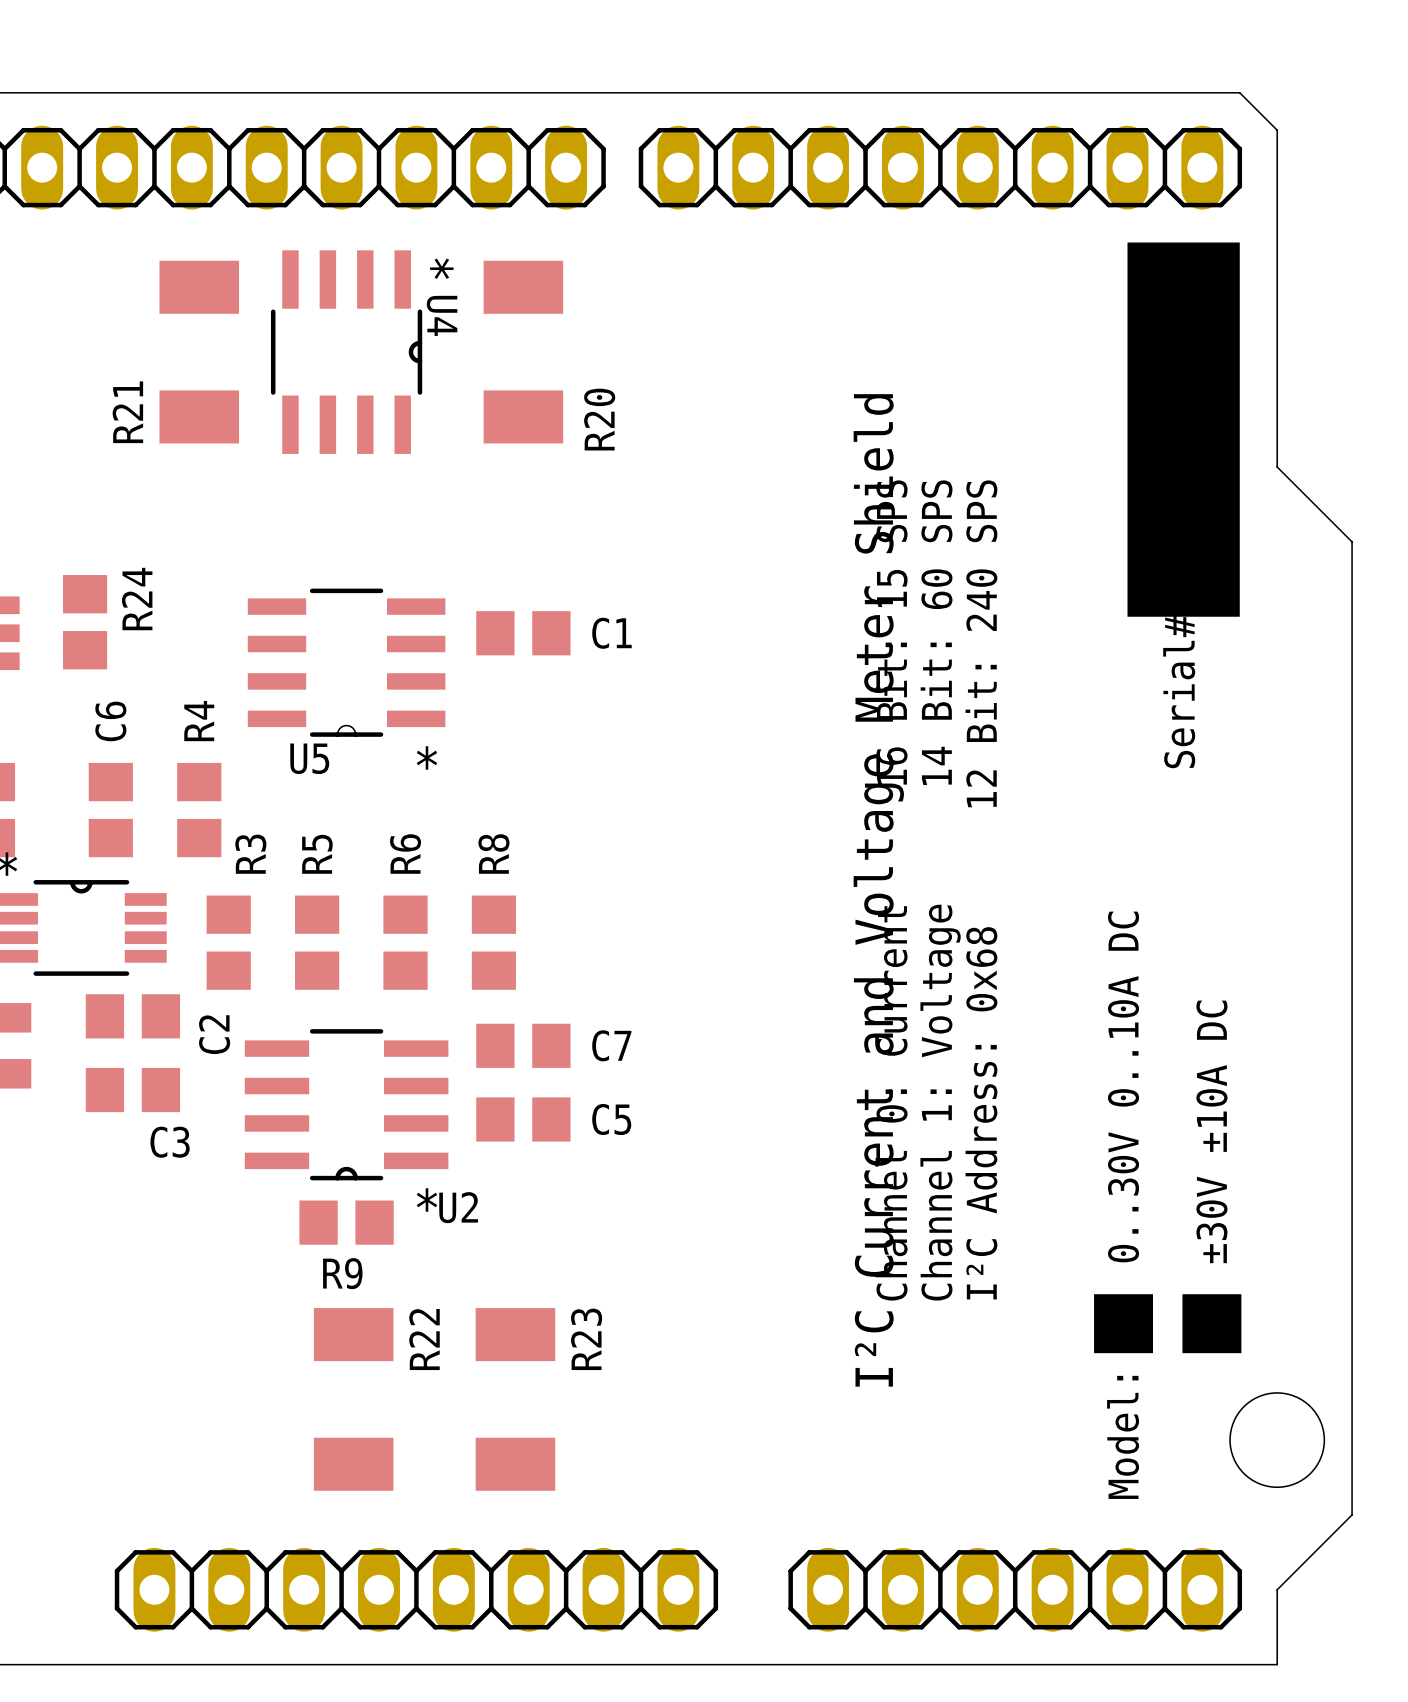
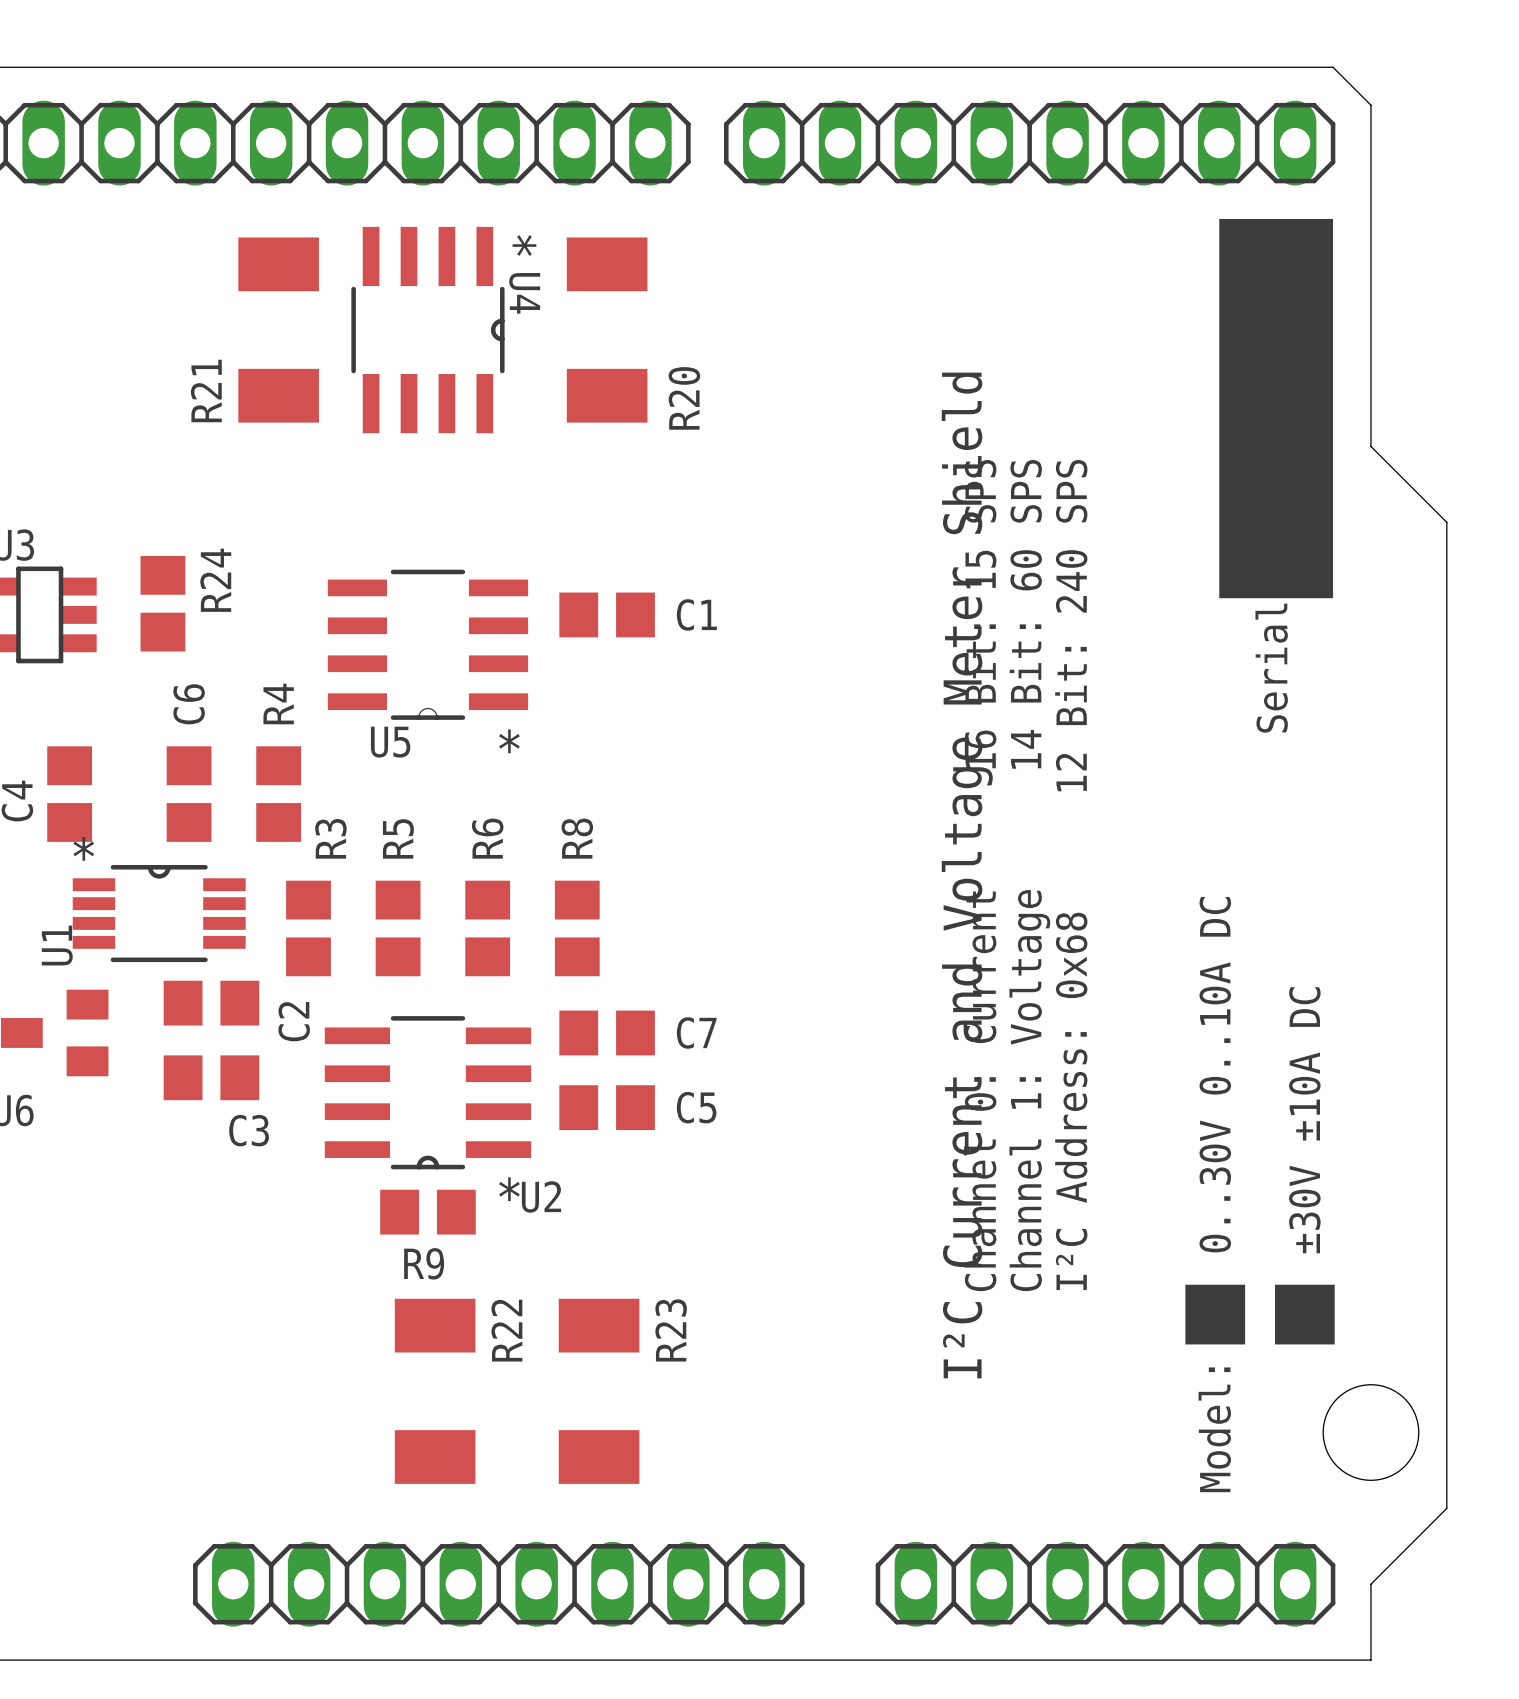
text: Serial# (1179, 691) -> Serial (1271, 668)

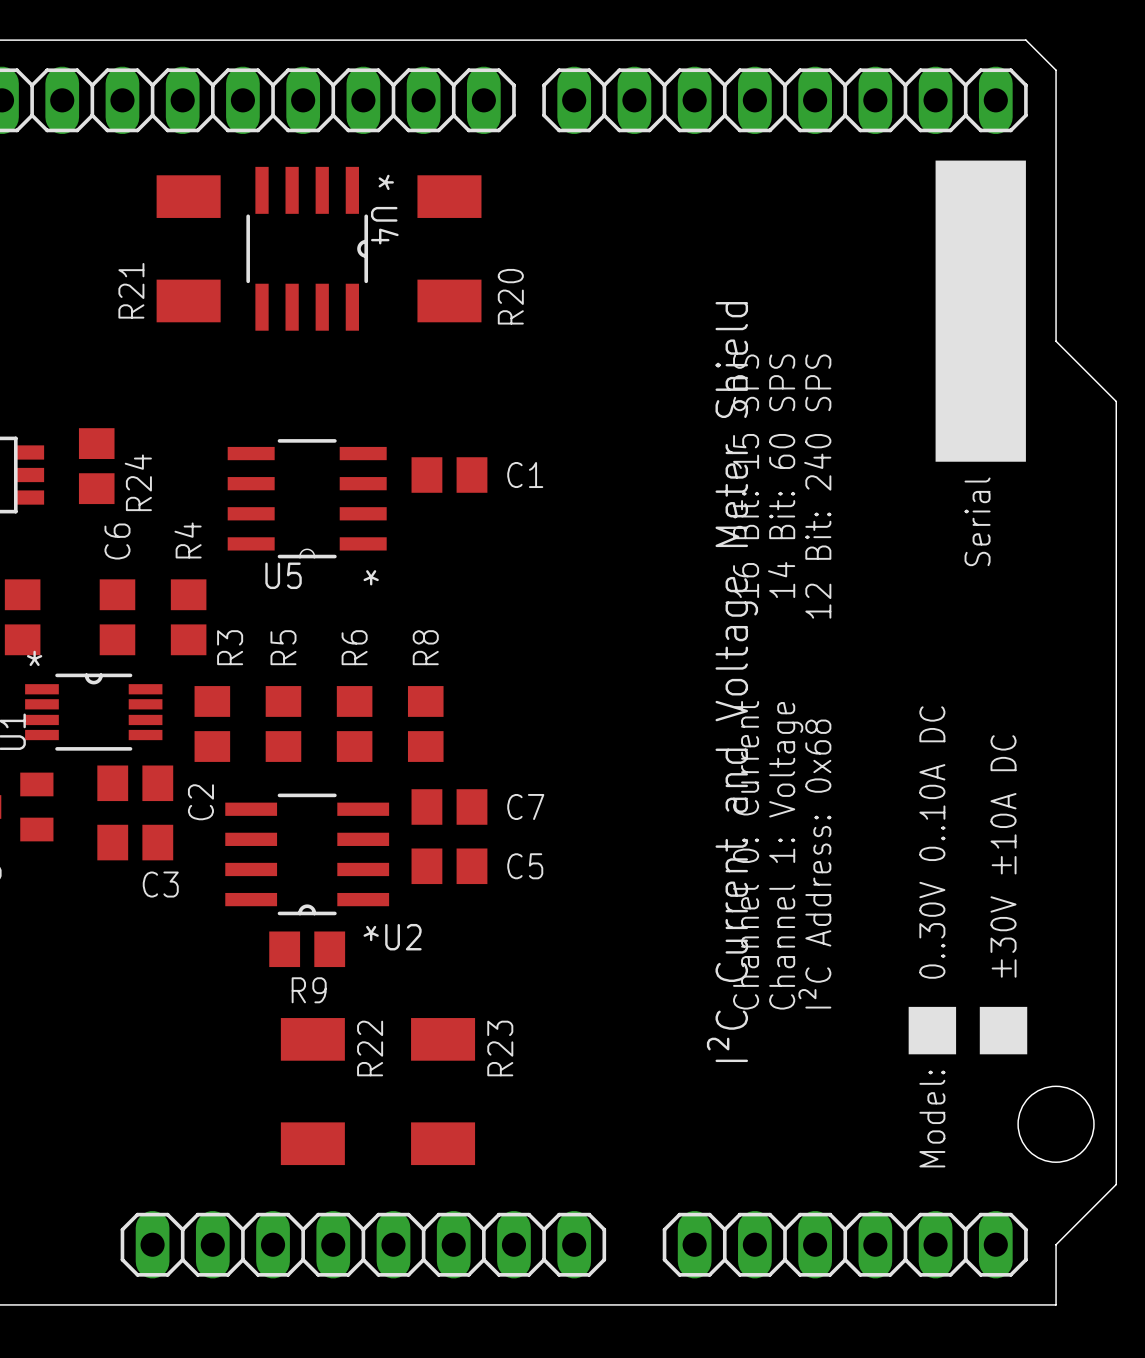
R24 name position: R24 (215, 580) -> R24 (138, 482)

